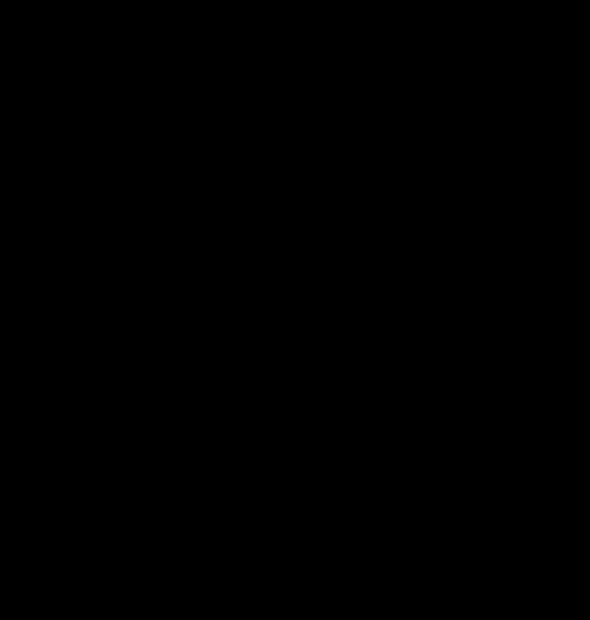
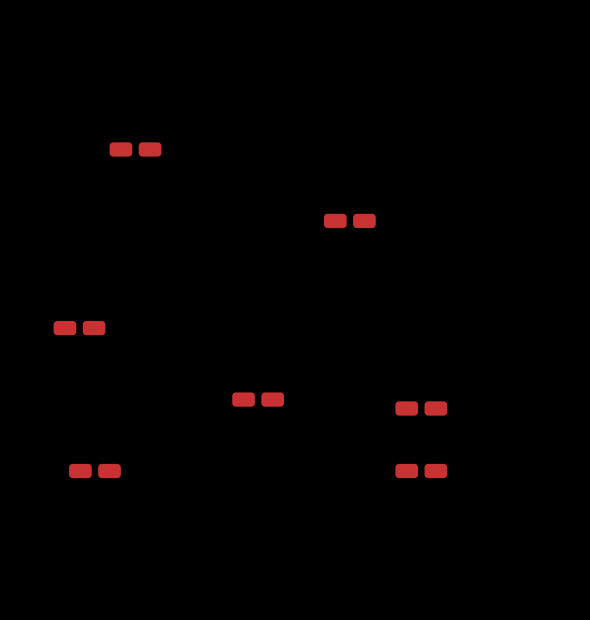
part: none -> (135, 149)
part: none -> (349, 220)
part: none -> (79, 328)
part: none -> (258, 399)
part: none -> (421, 408)
part: none -> (94, 471)
part: none -> (421, 471)

